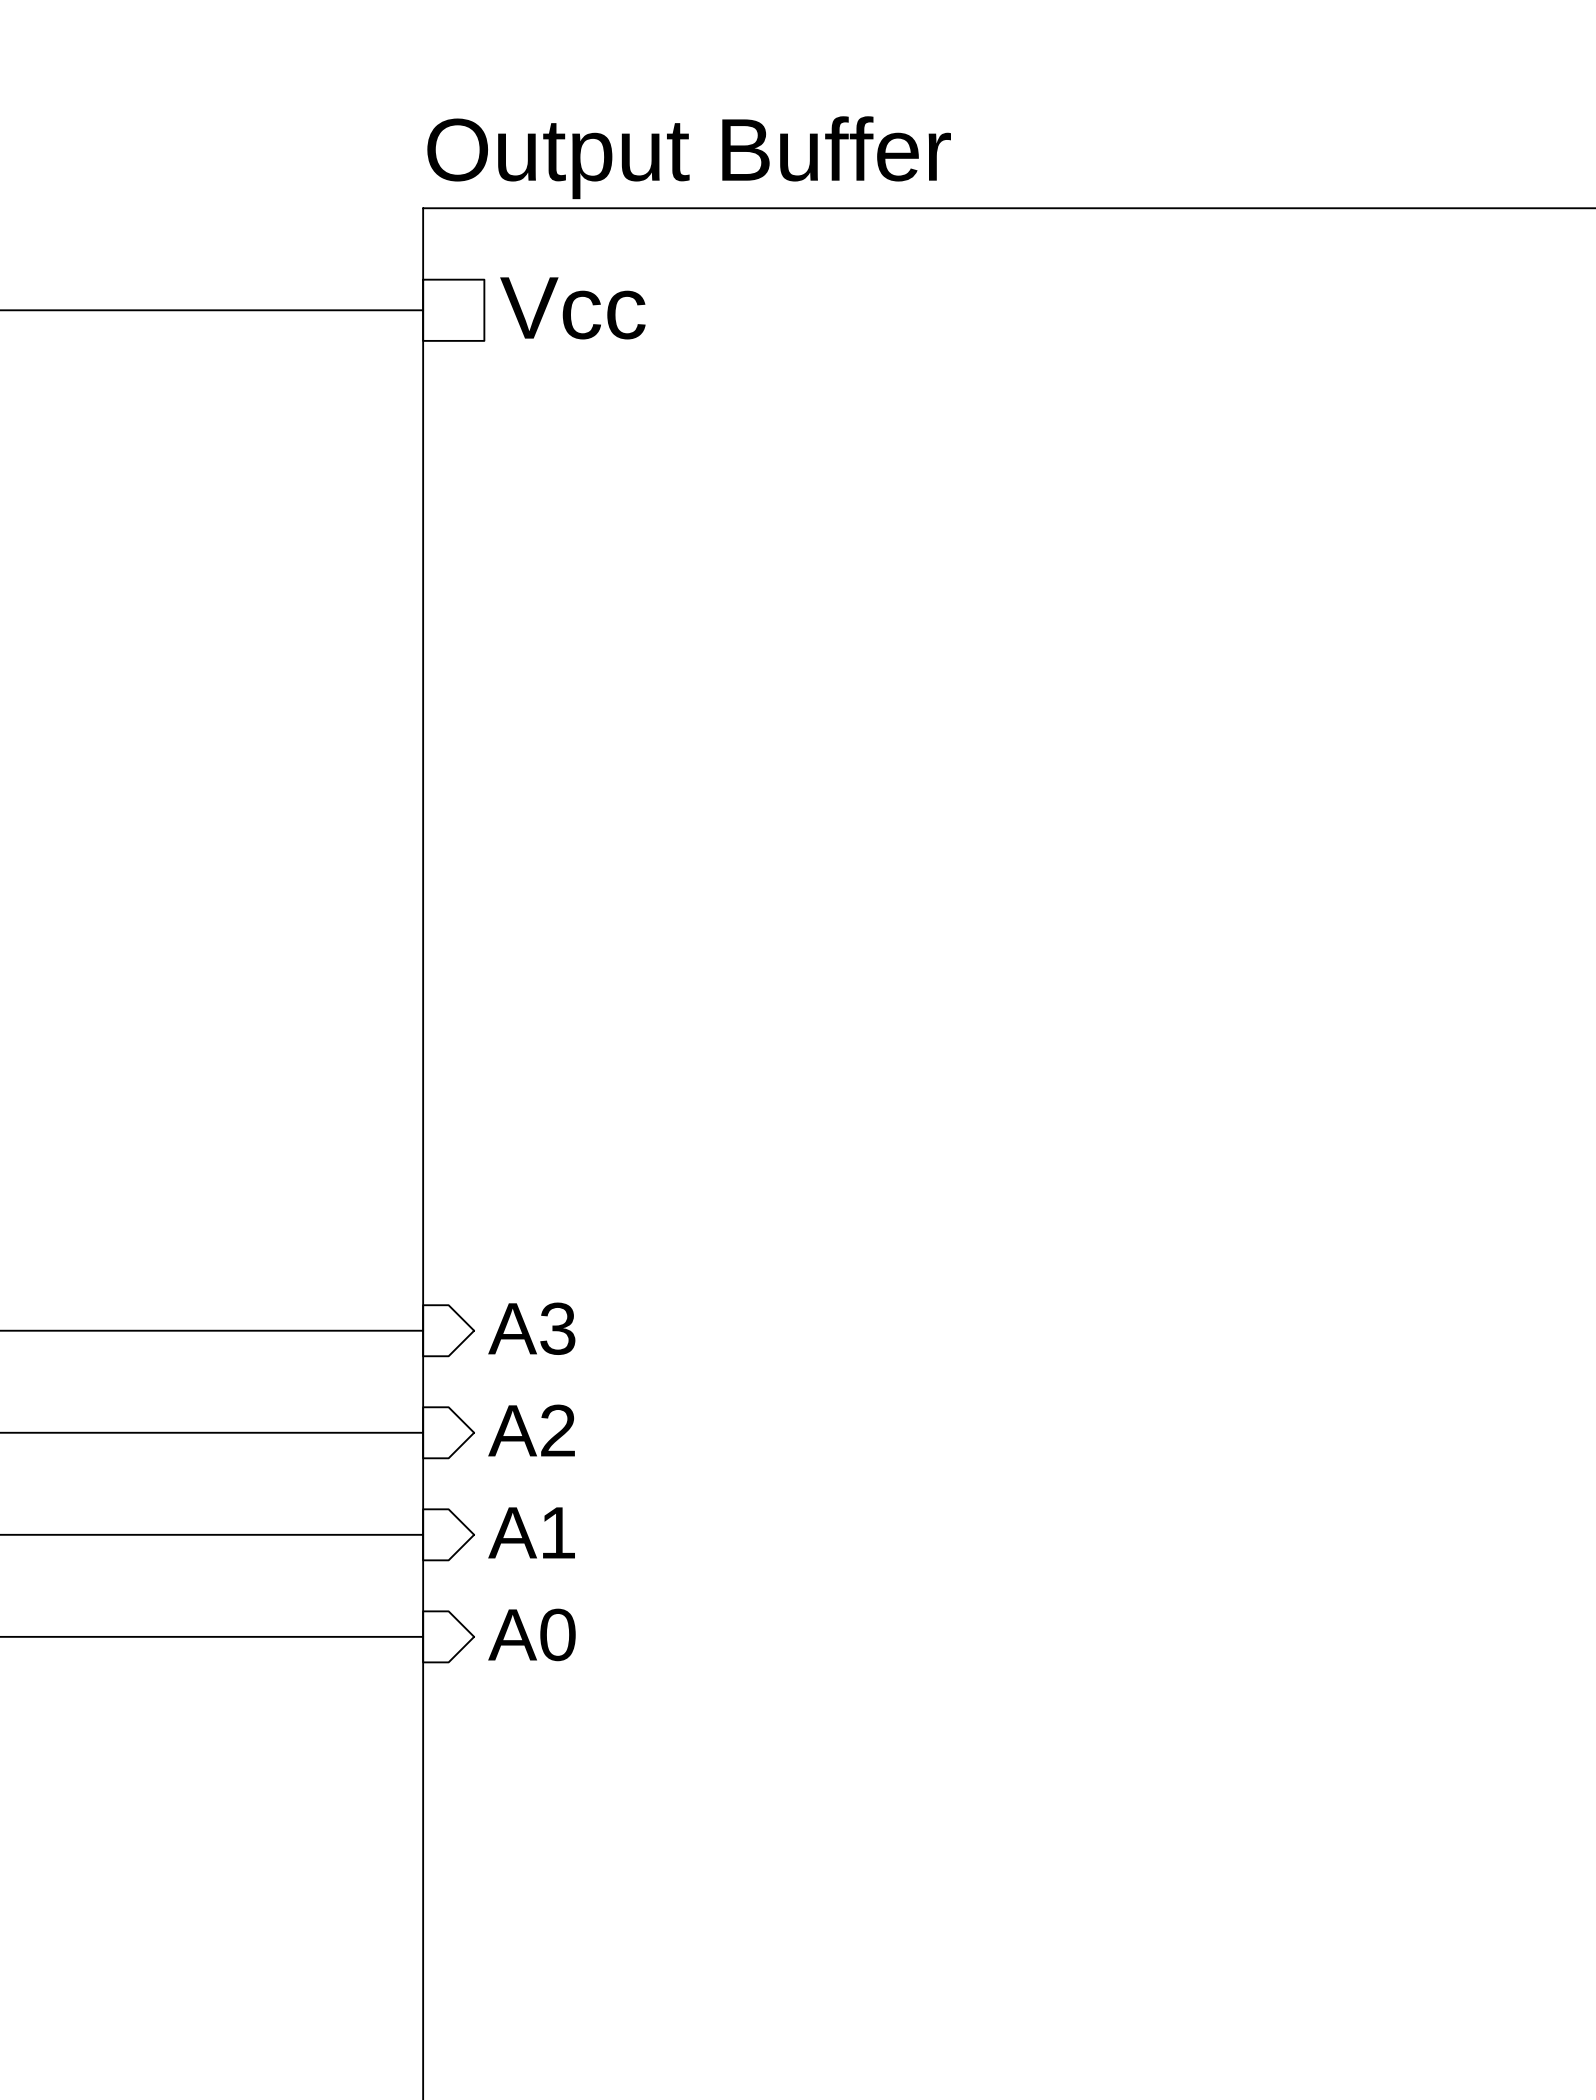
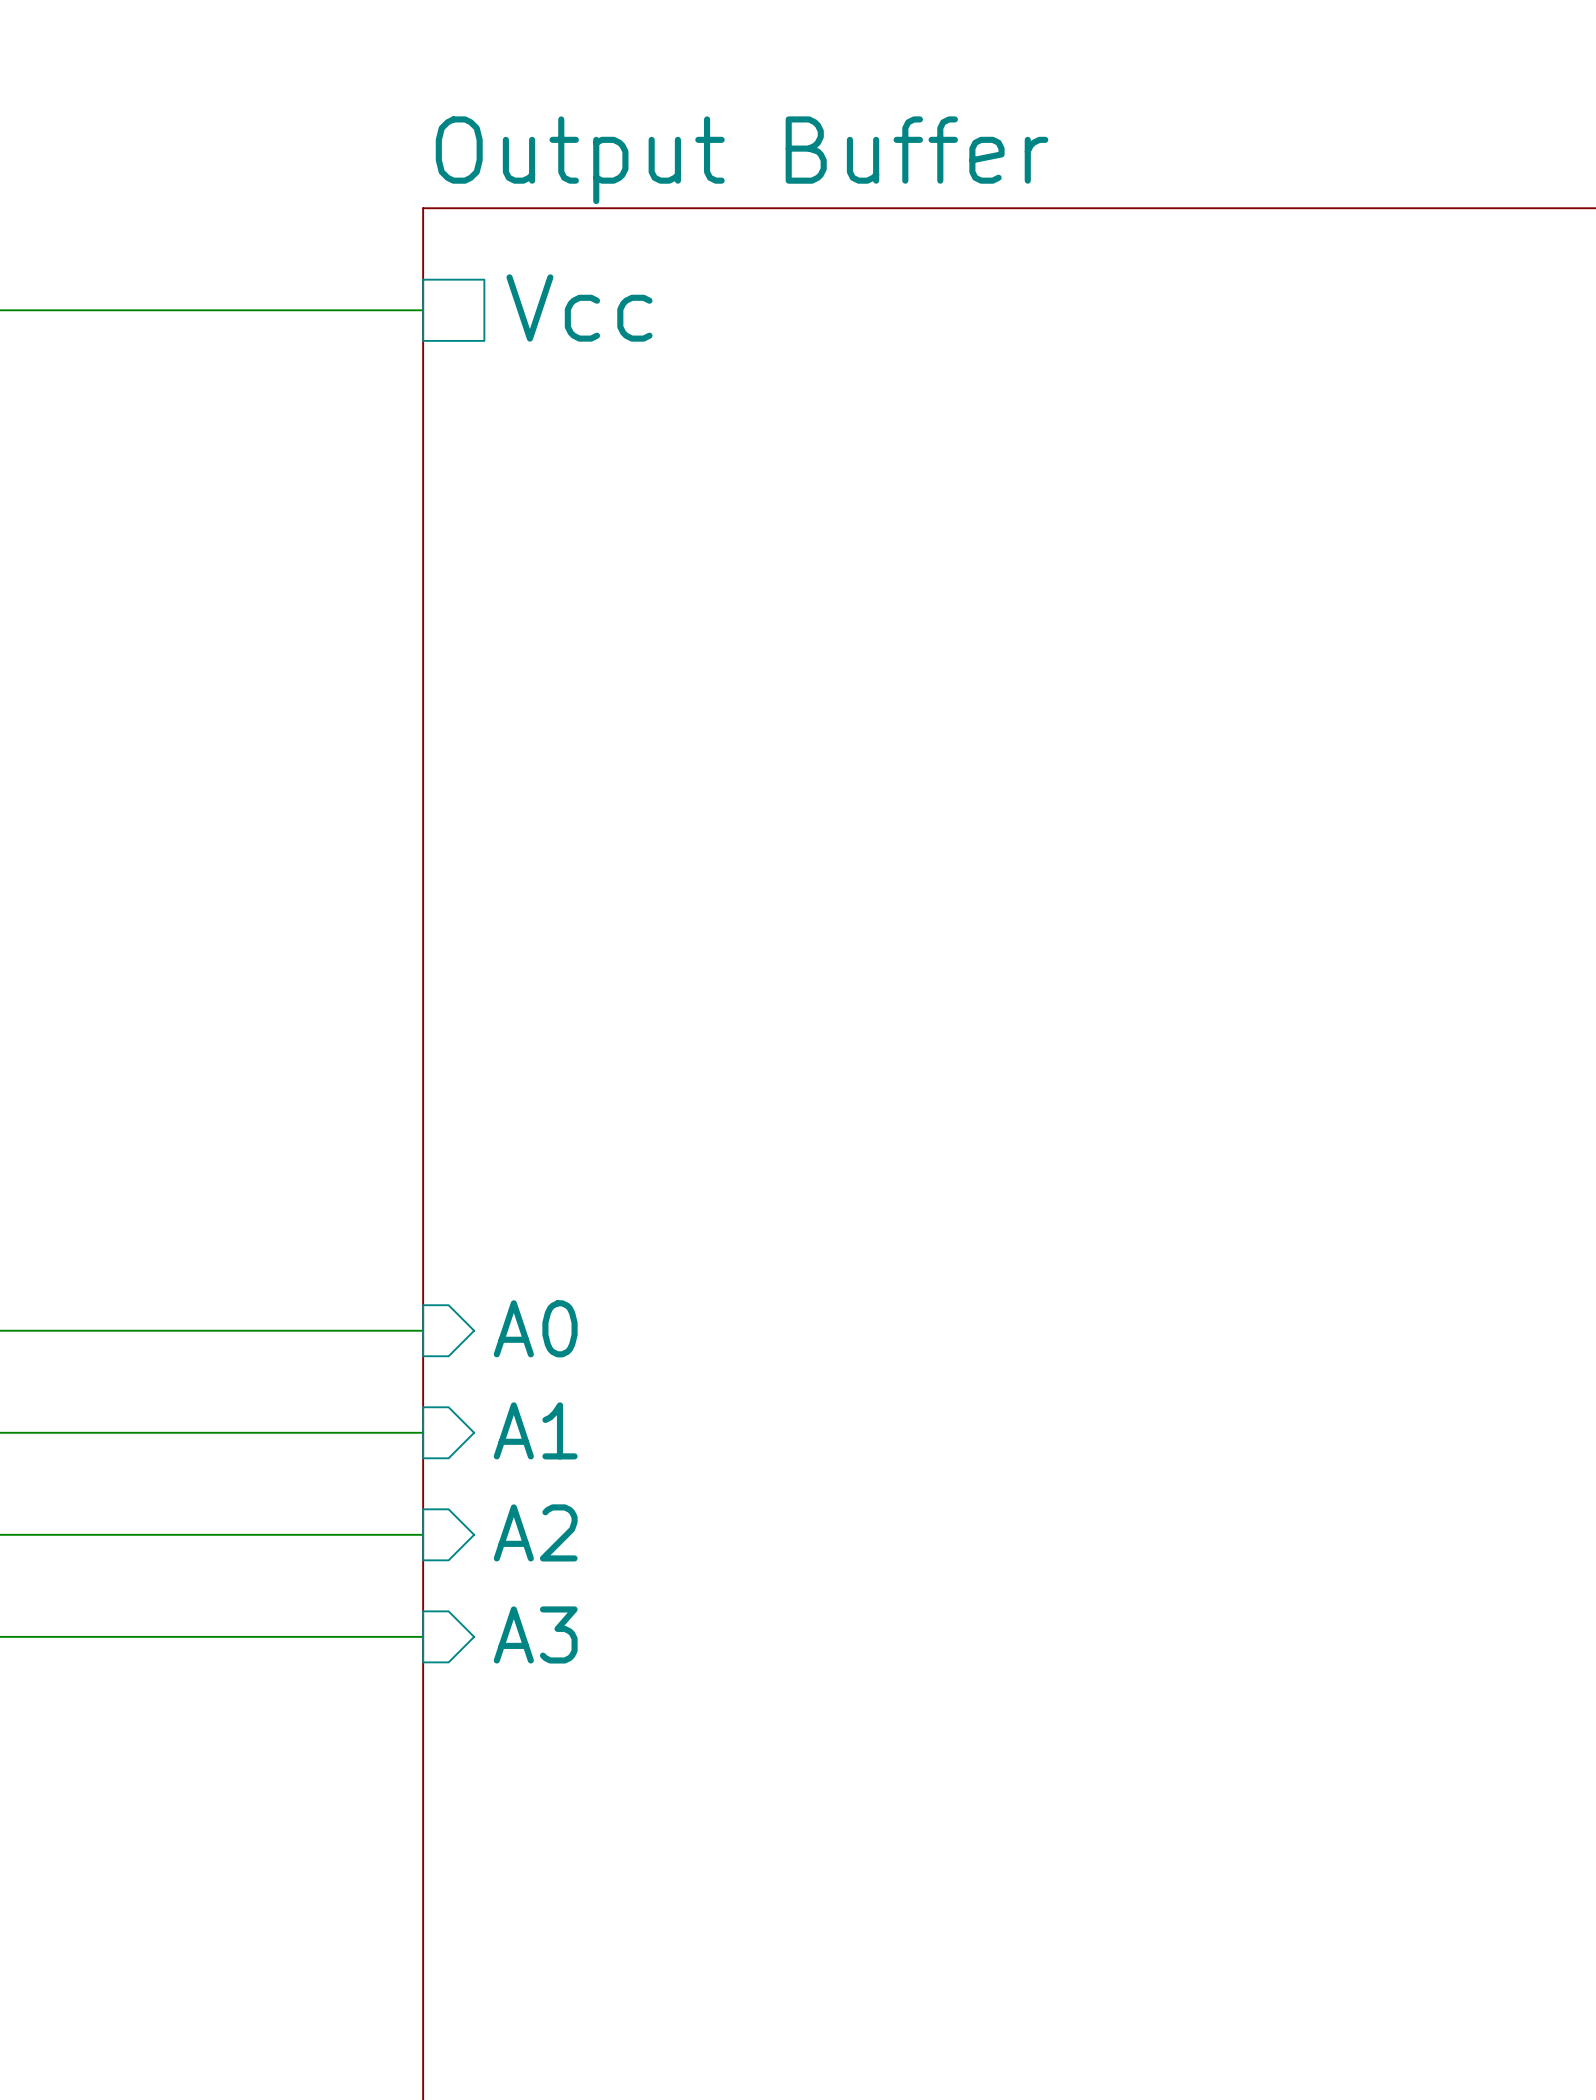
sheet pin: A3 (531, 1328) -> A0 (535, 1328)
sheet pin: A2 (531, 1430) -> A1 (535, 1430)
sheet pin: A1 (531, 1532) -> A2 (535, 1532)
sheet pin: A0 (531, 1634) -> A3 (535, 1634)

